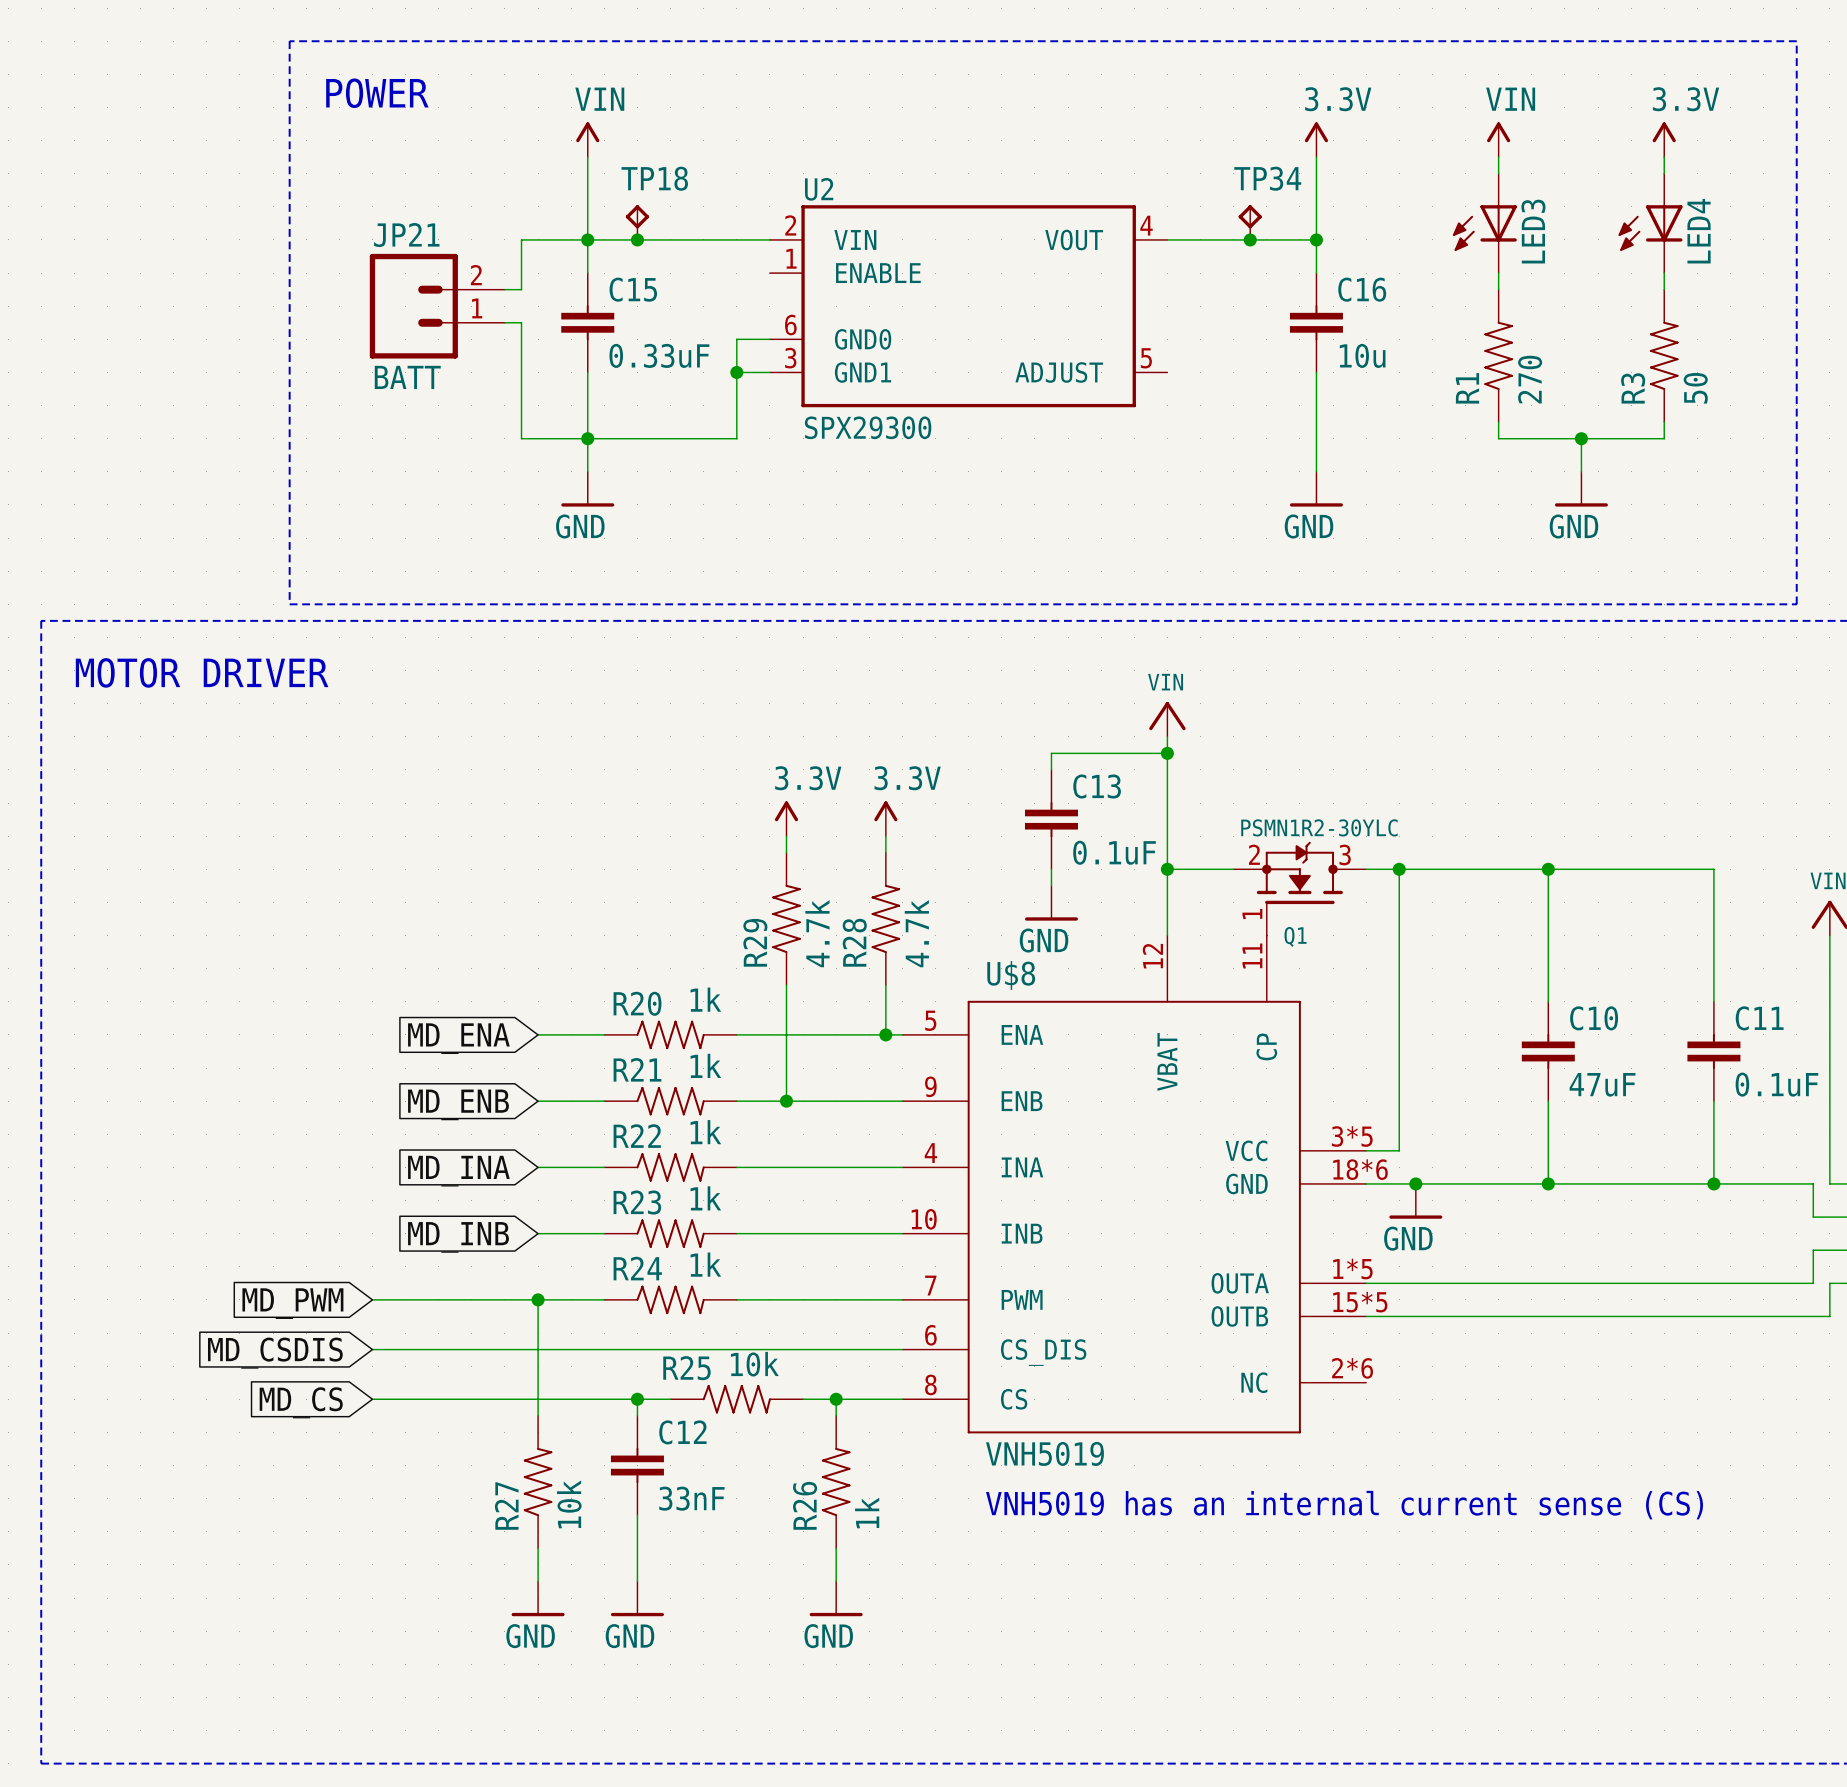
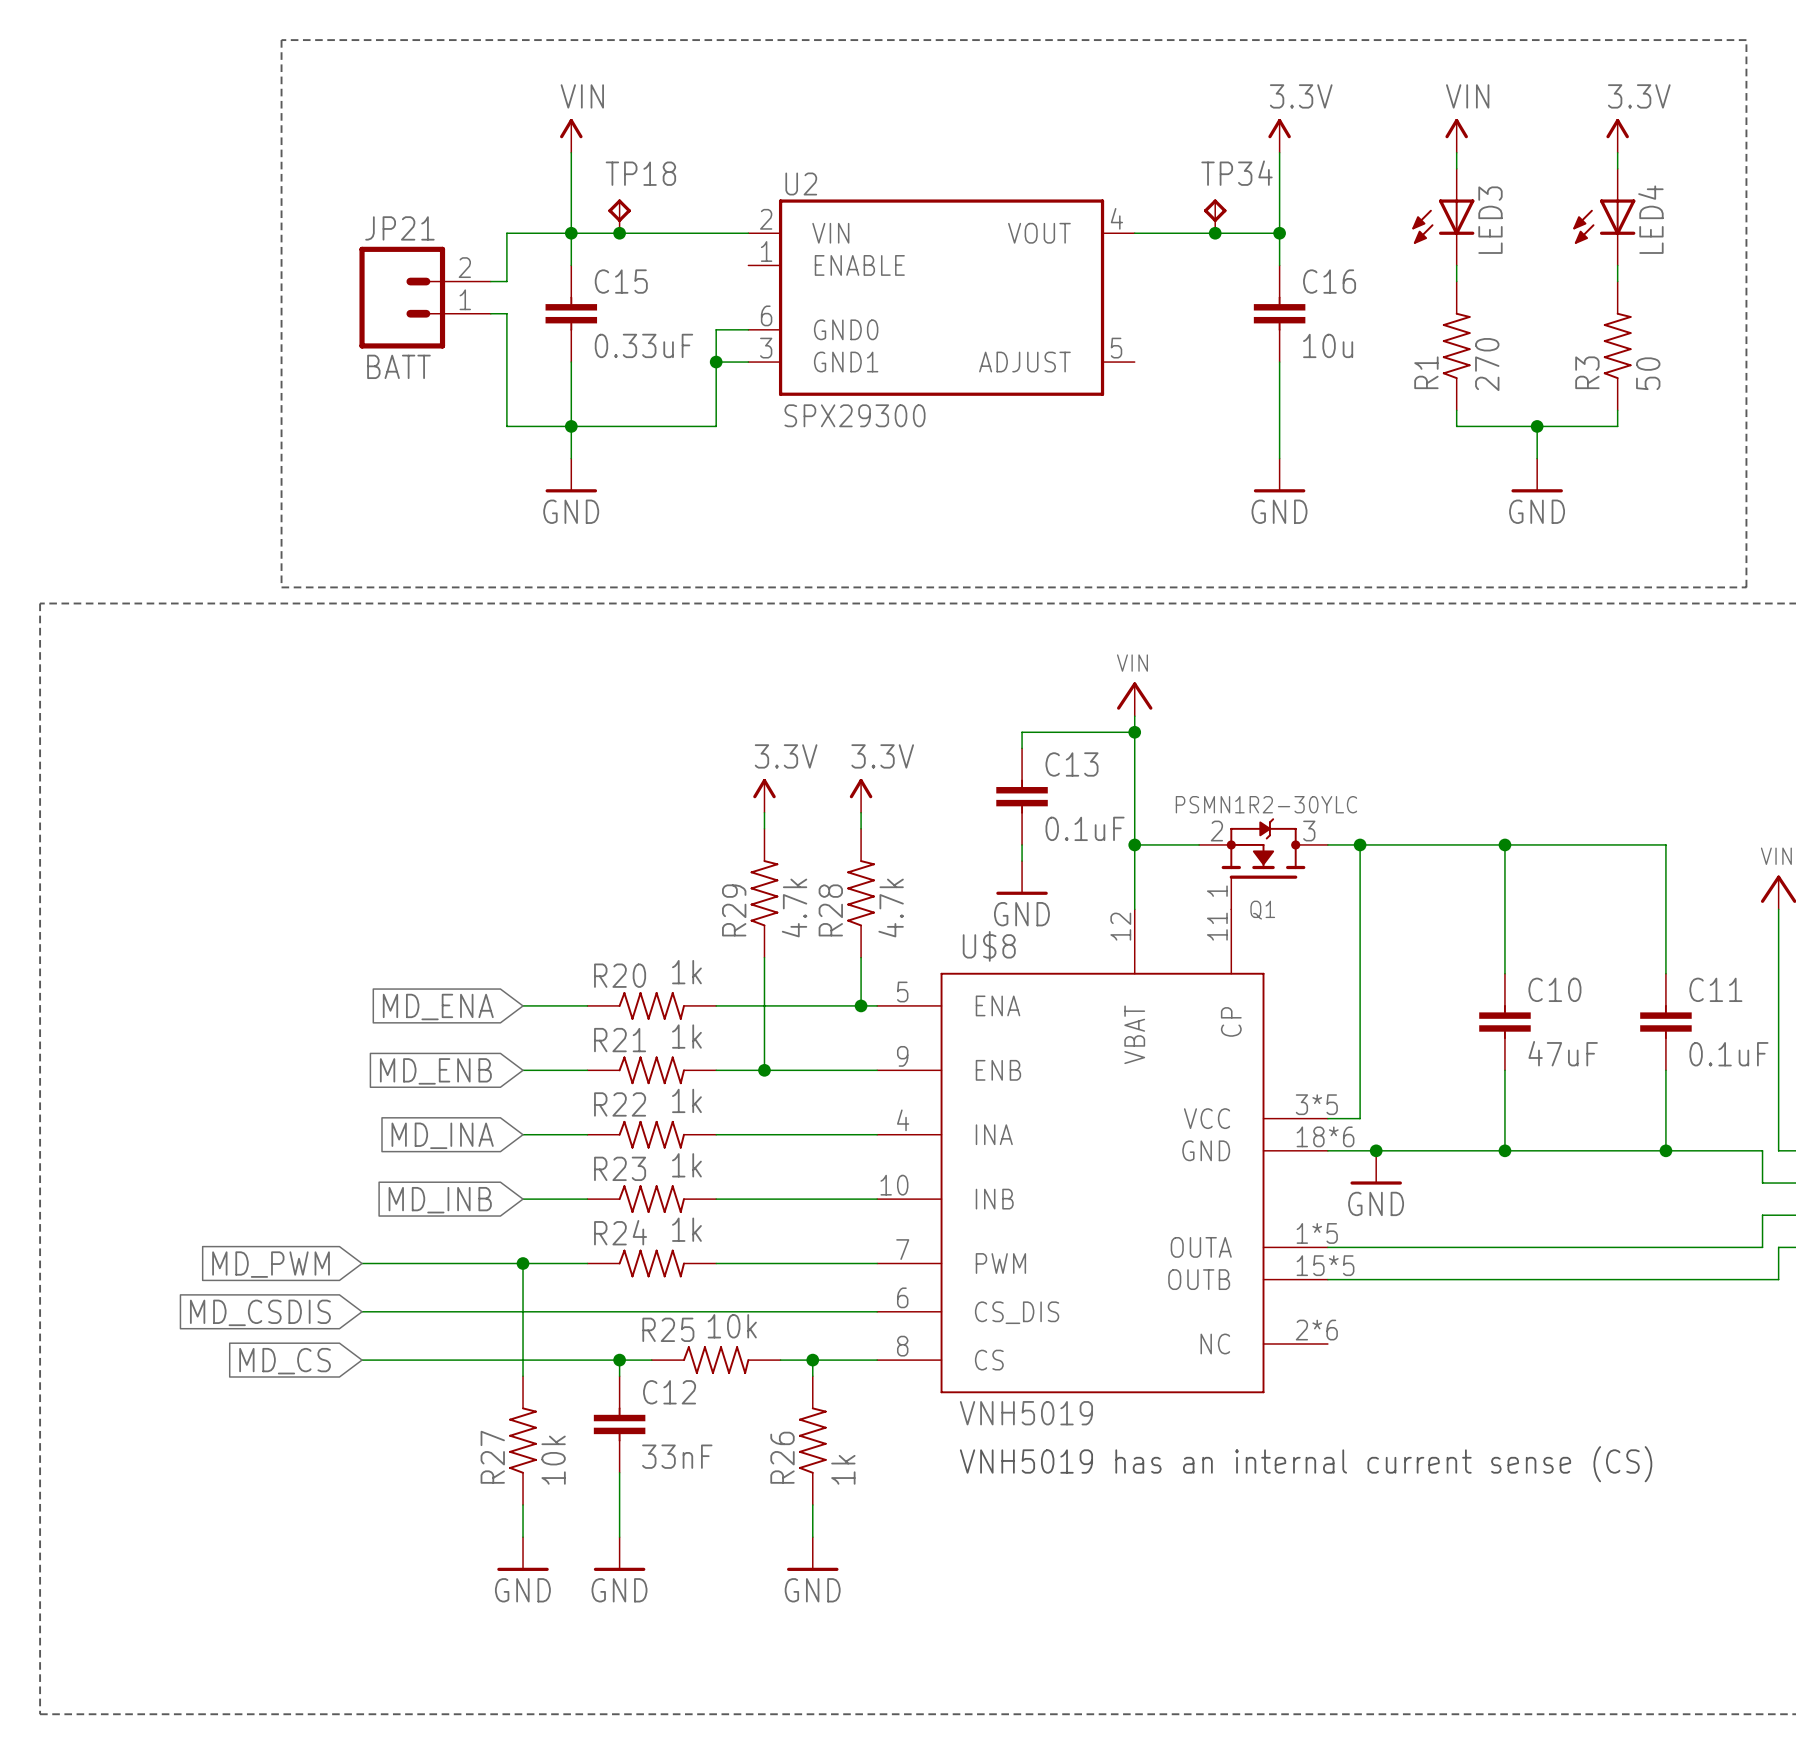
text: POWER (377, 93) -> none
text: MOTOR DRIVER (202, 672) -> none

